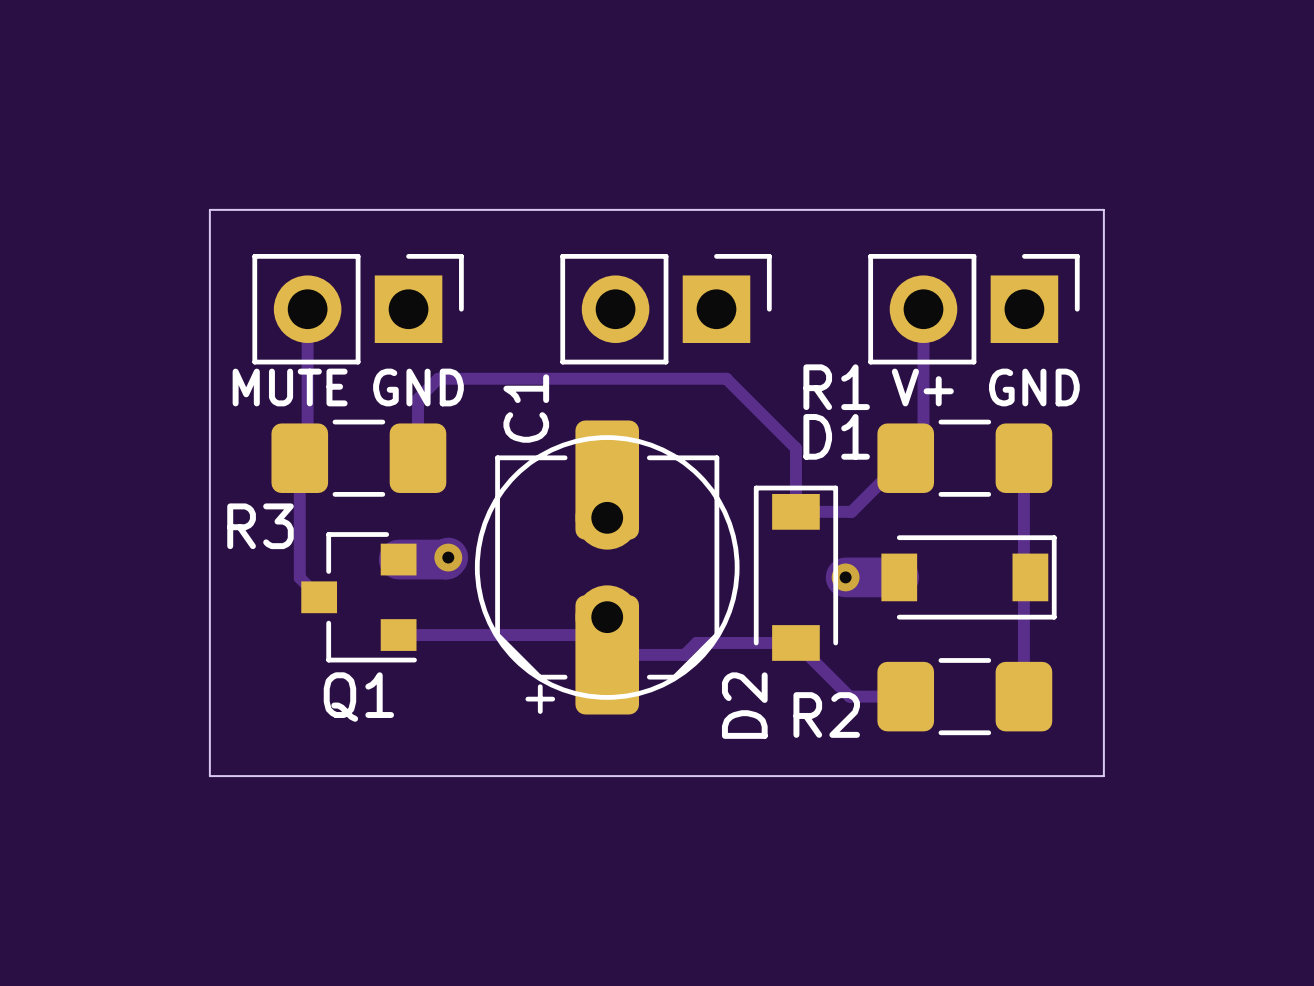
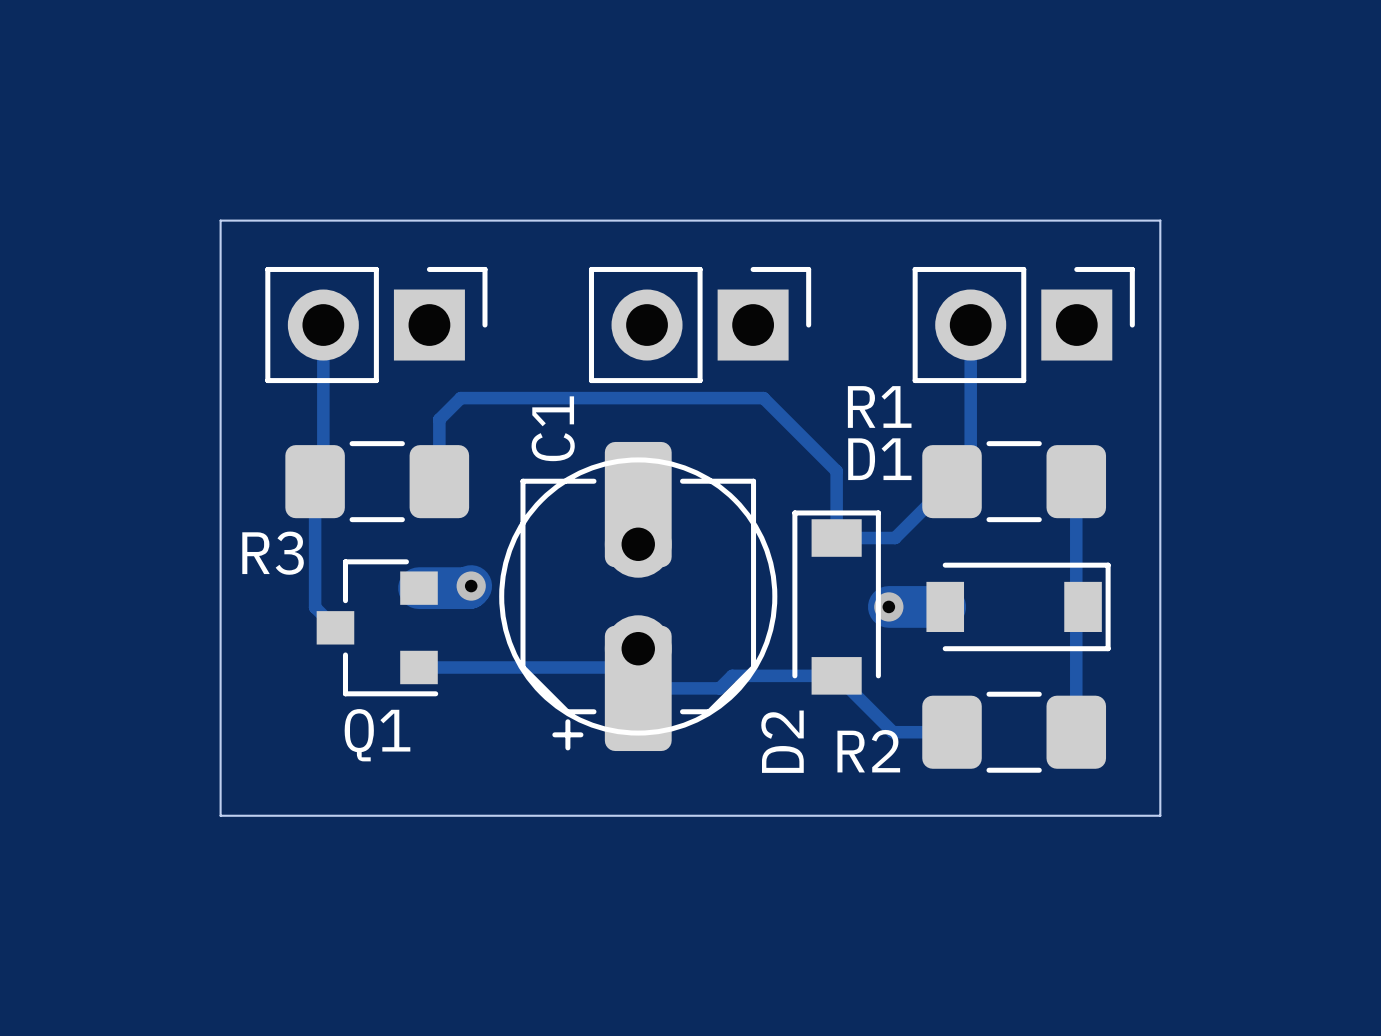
text: MUTE (290, 387) -> none
text: GND (418, 387) -> none
text: V+ (922, 387) -> none
text: GND (1034, 387) -> none

